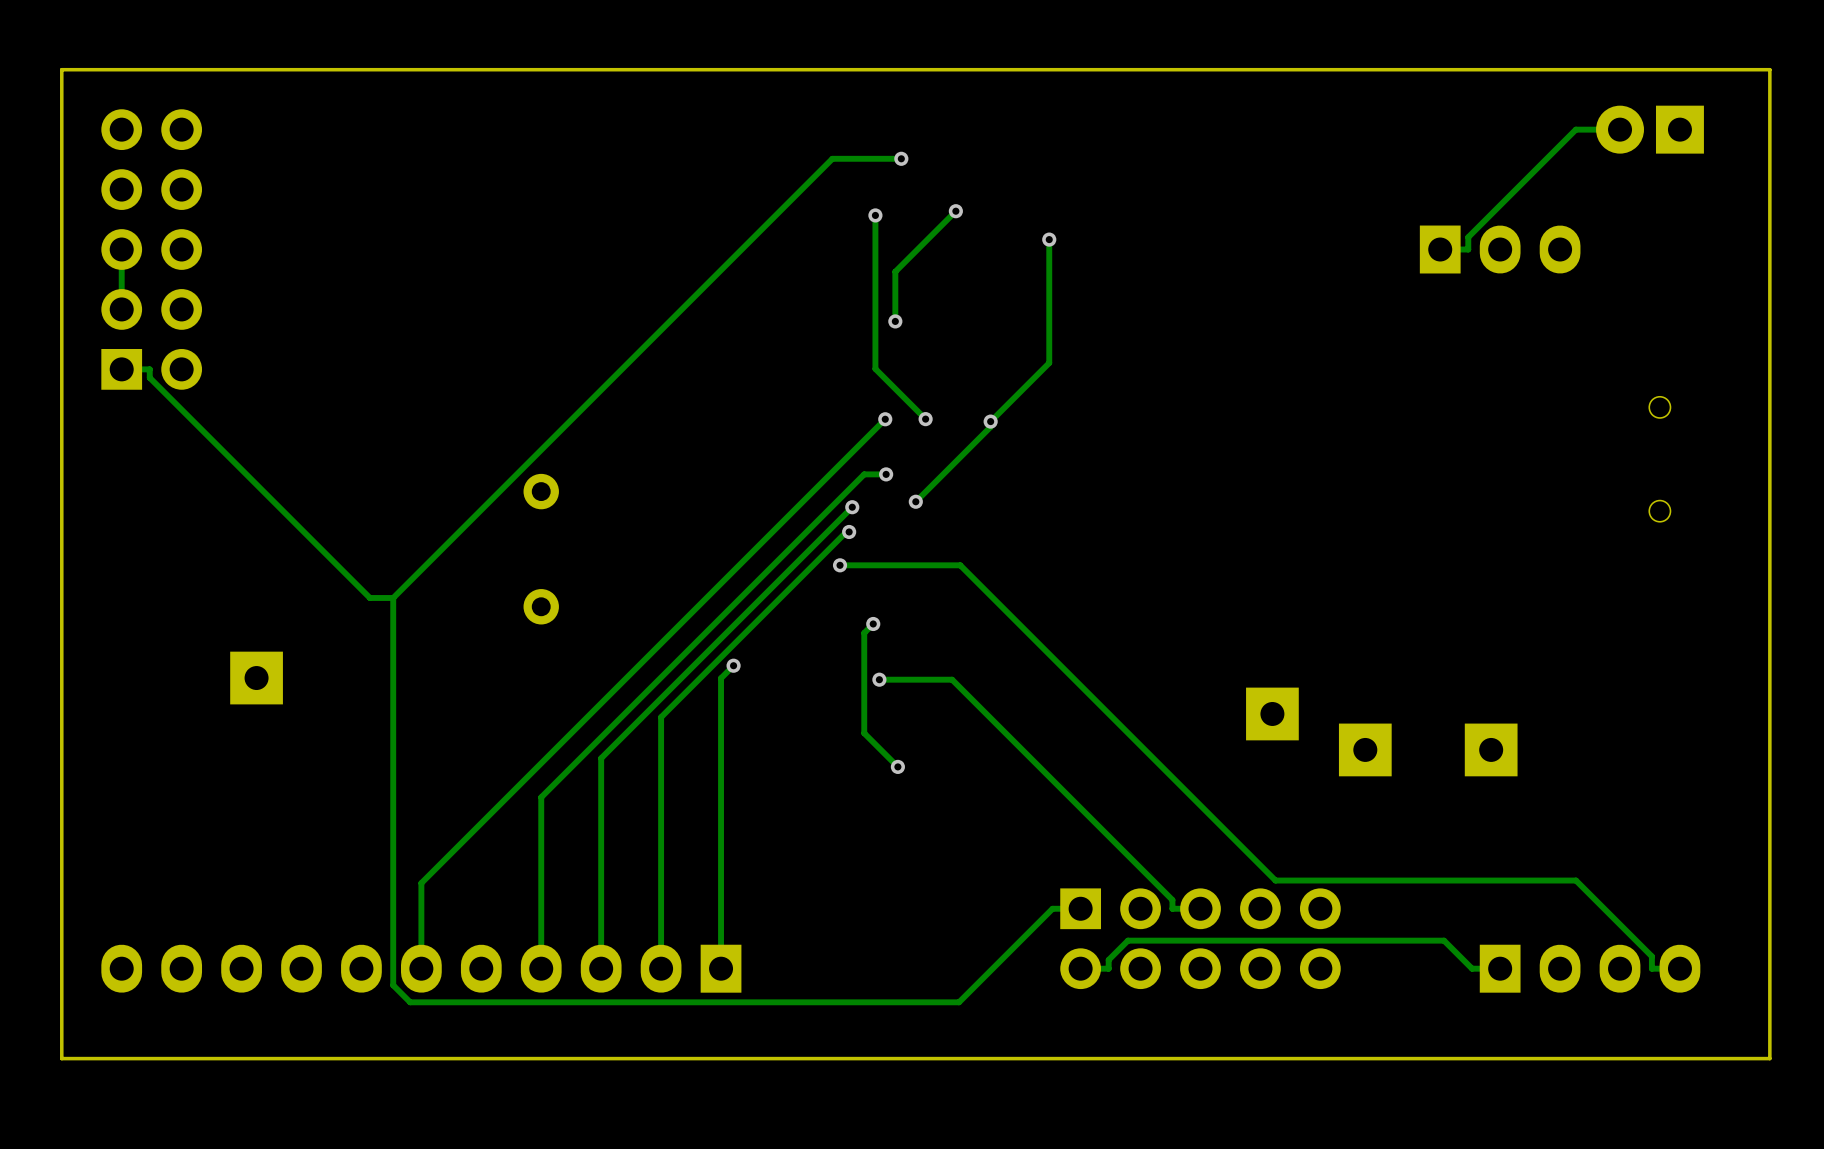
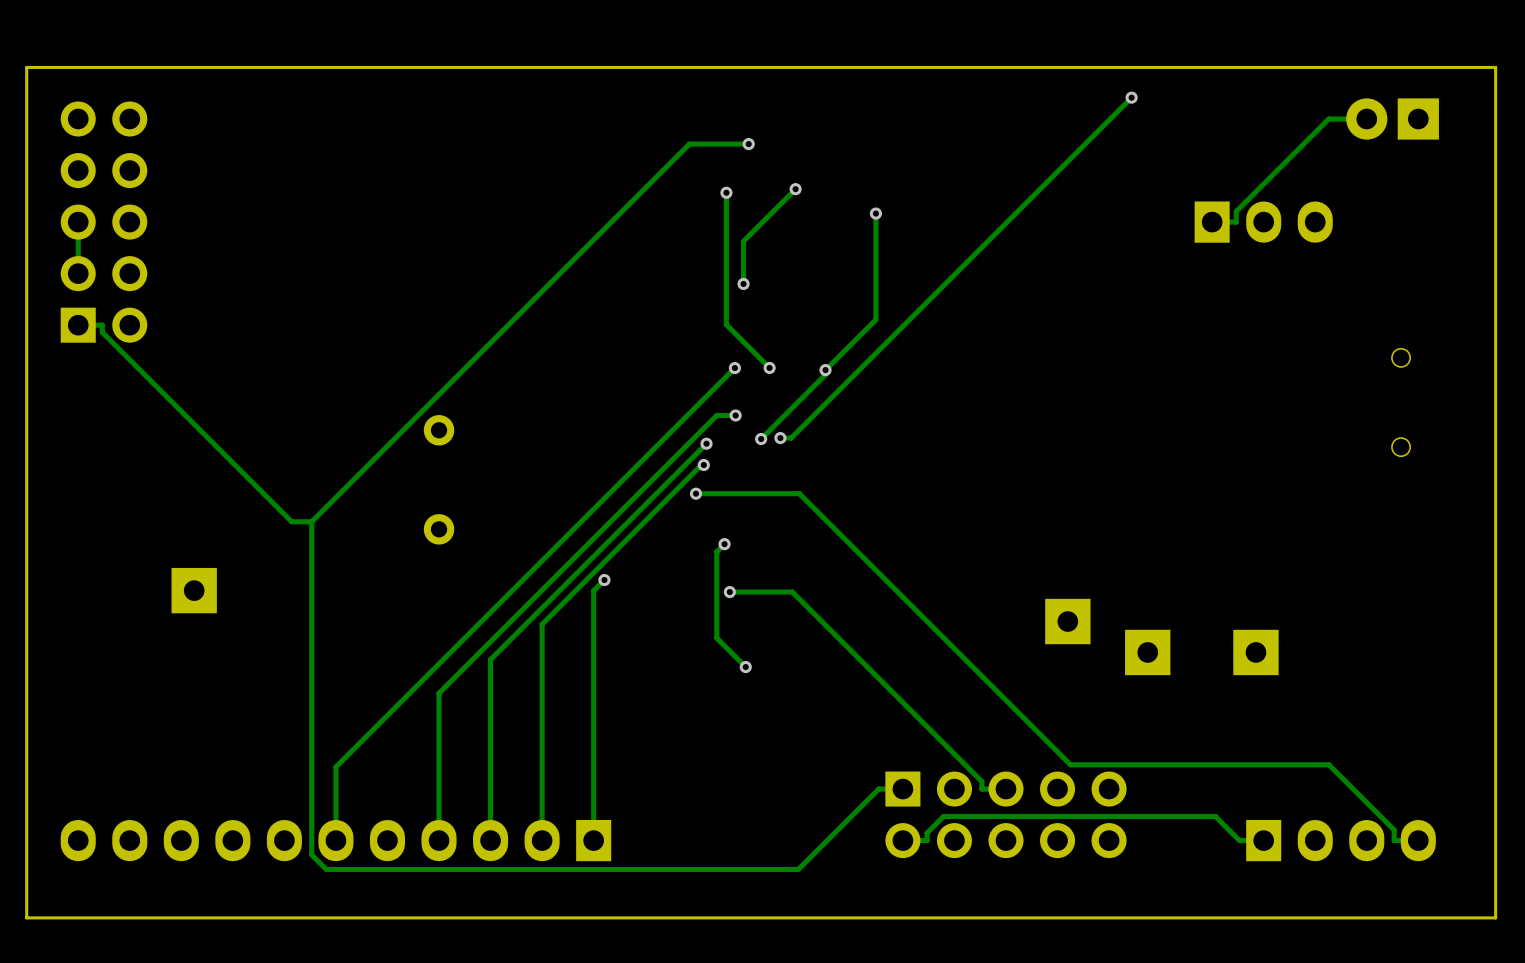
track: none -> (1131, 97) (791, 438) (780, 438)
via: none -> (1131, 97)
via: none -> (780, 438)

